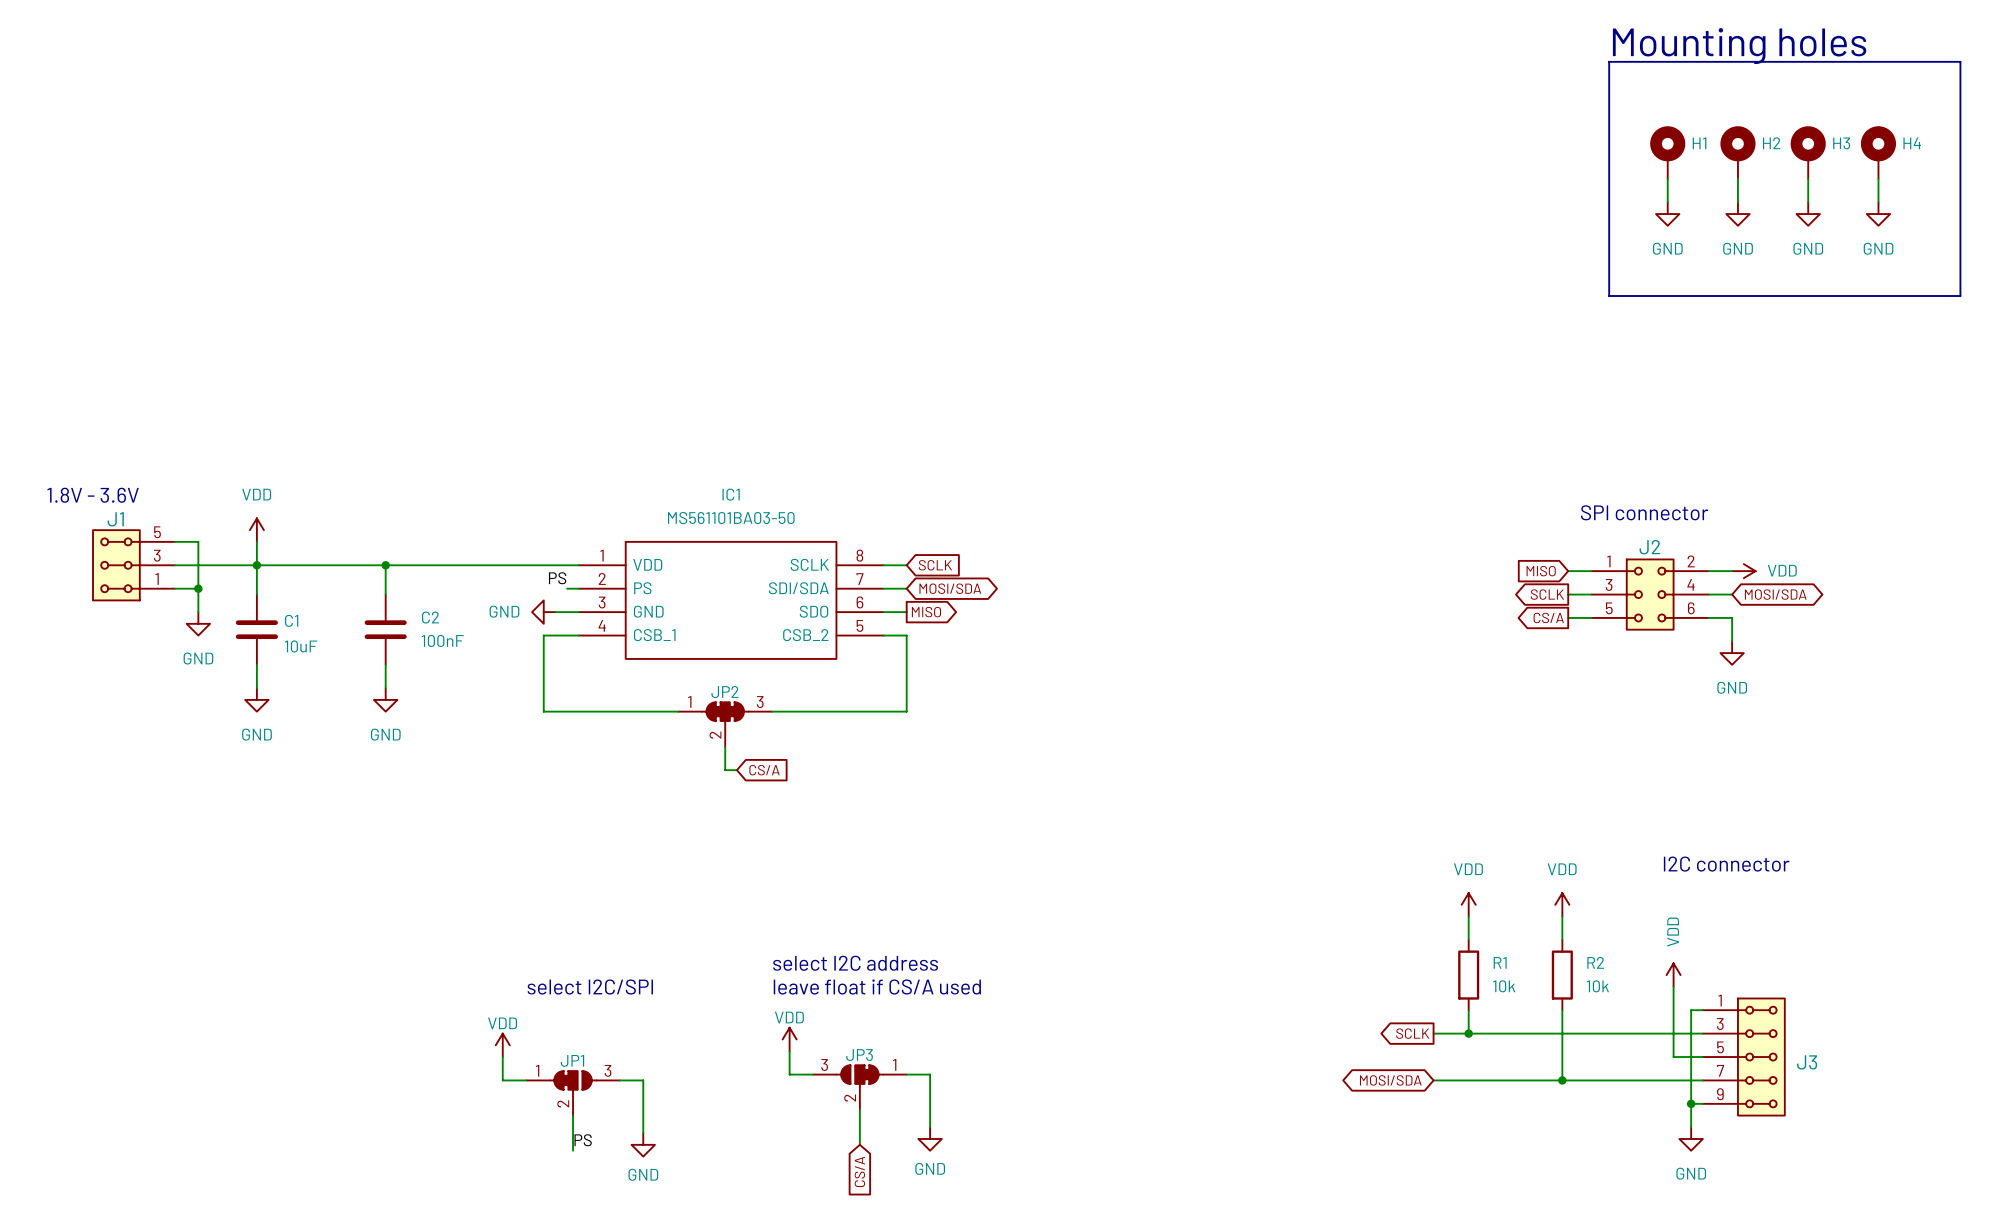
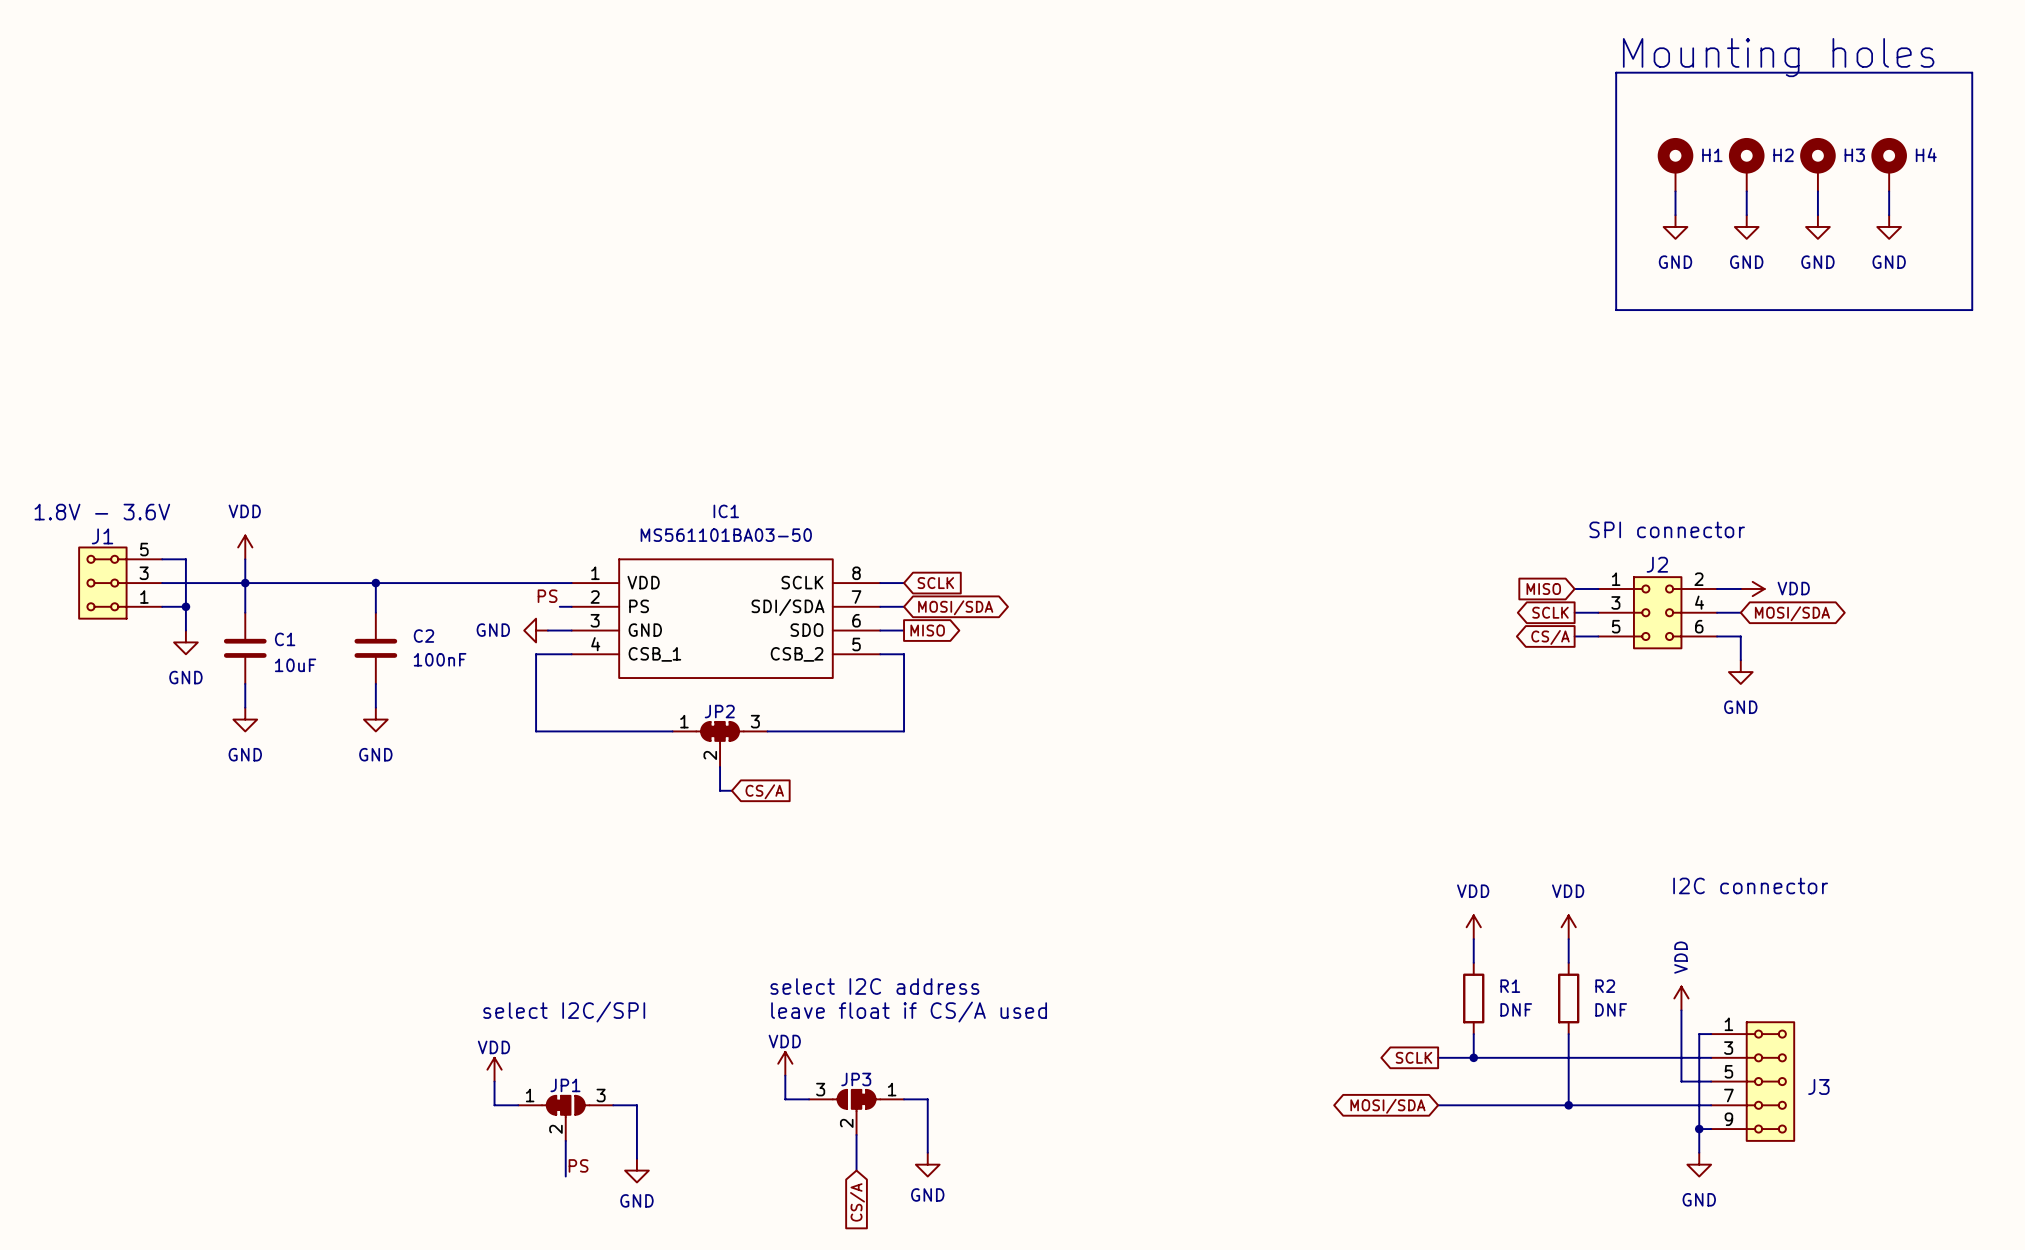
R1 value: 10k (1504, 986) -> DNF (1516, 1009)
R2 value: 10k (1597, 986) -> DNF (1611, 1009)

